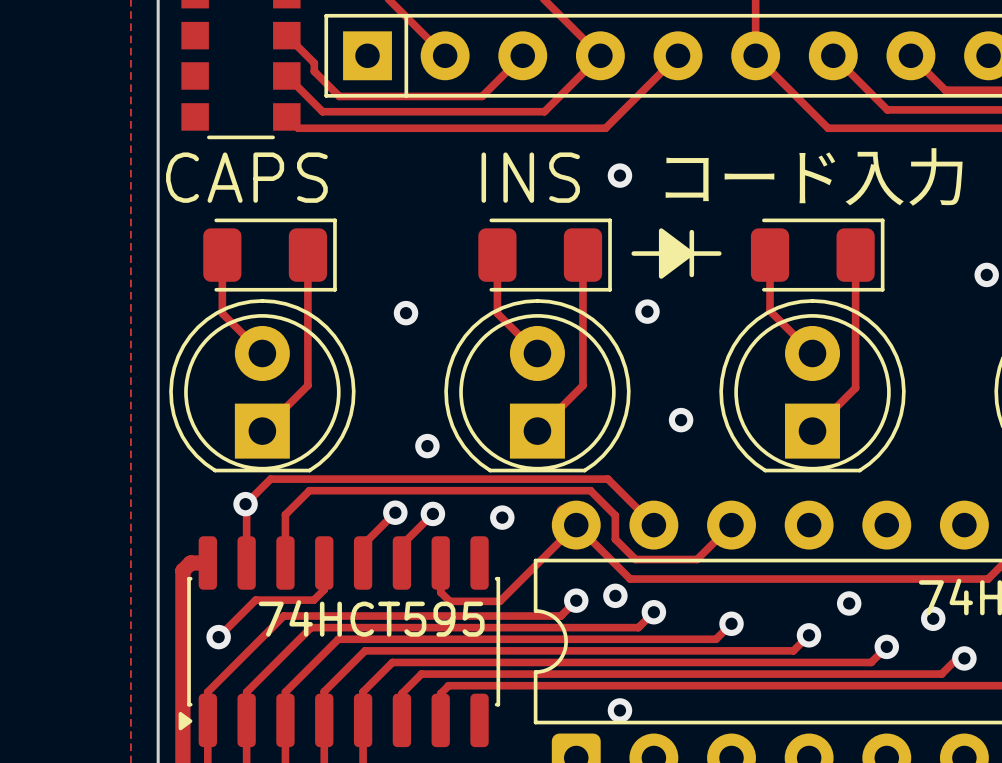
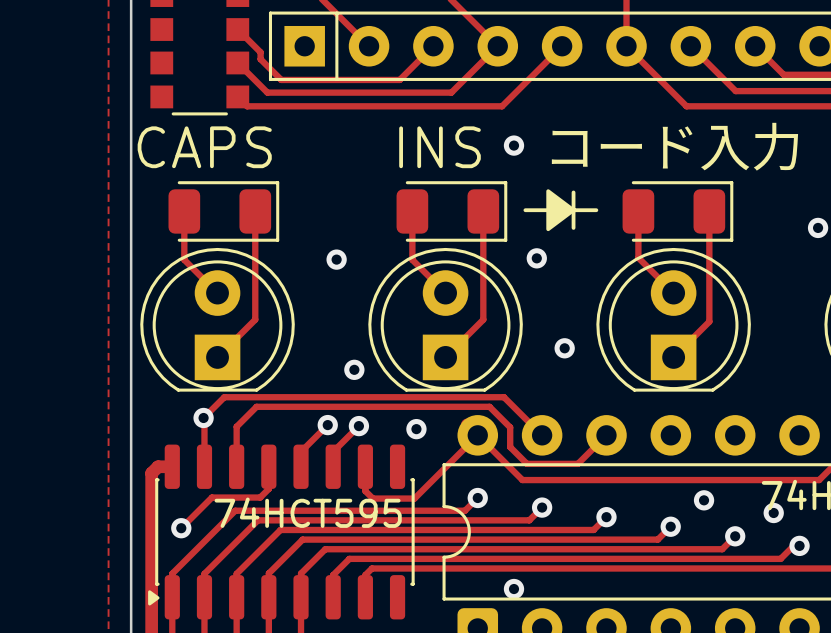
via: (615, 595) -> none

